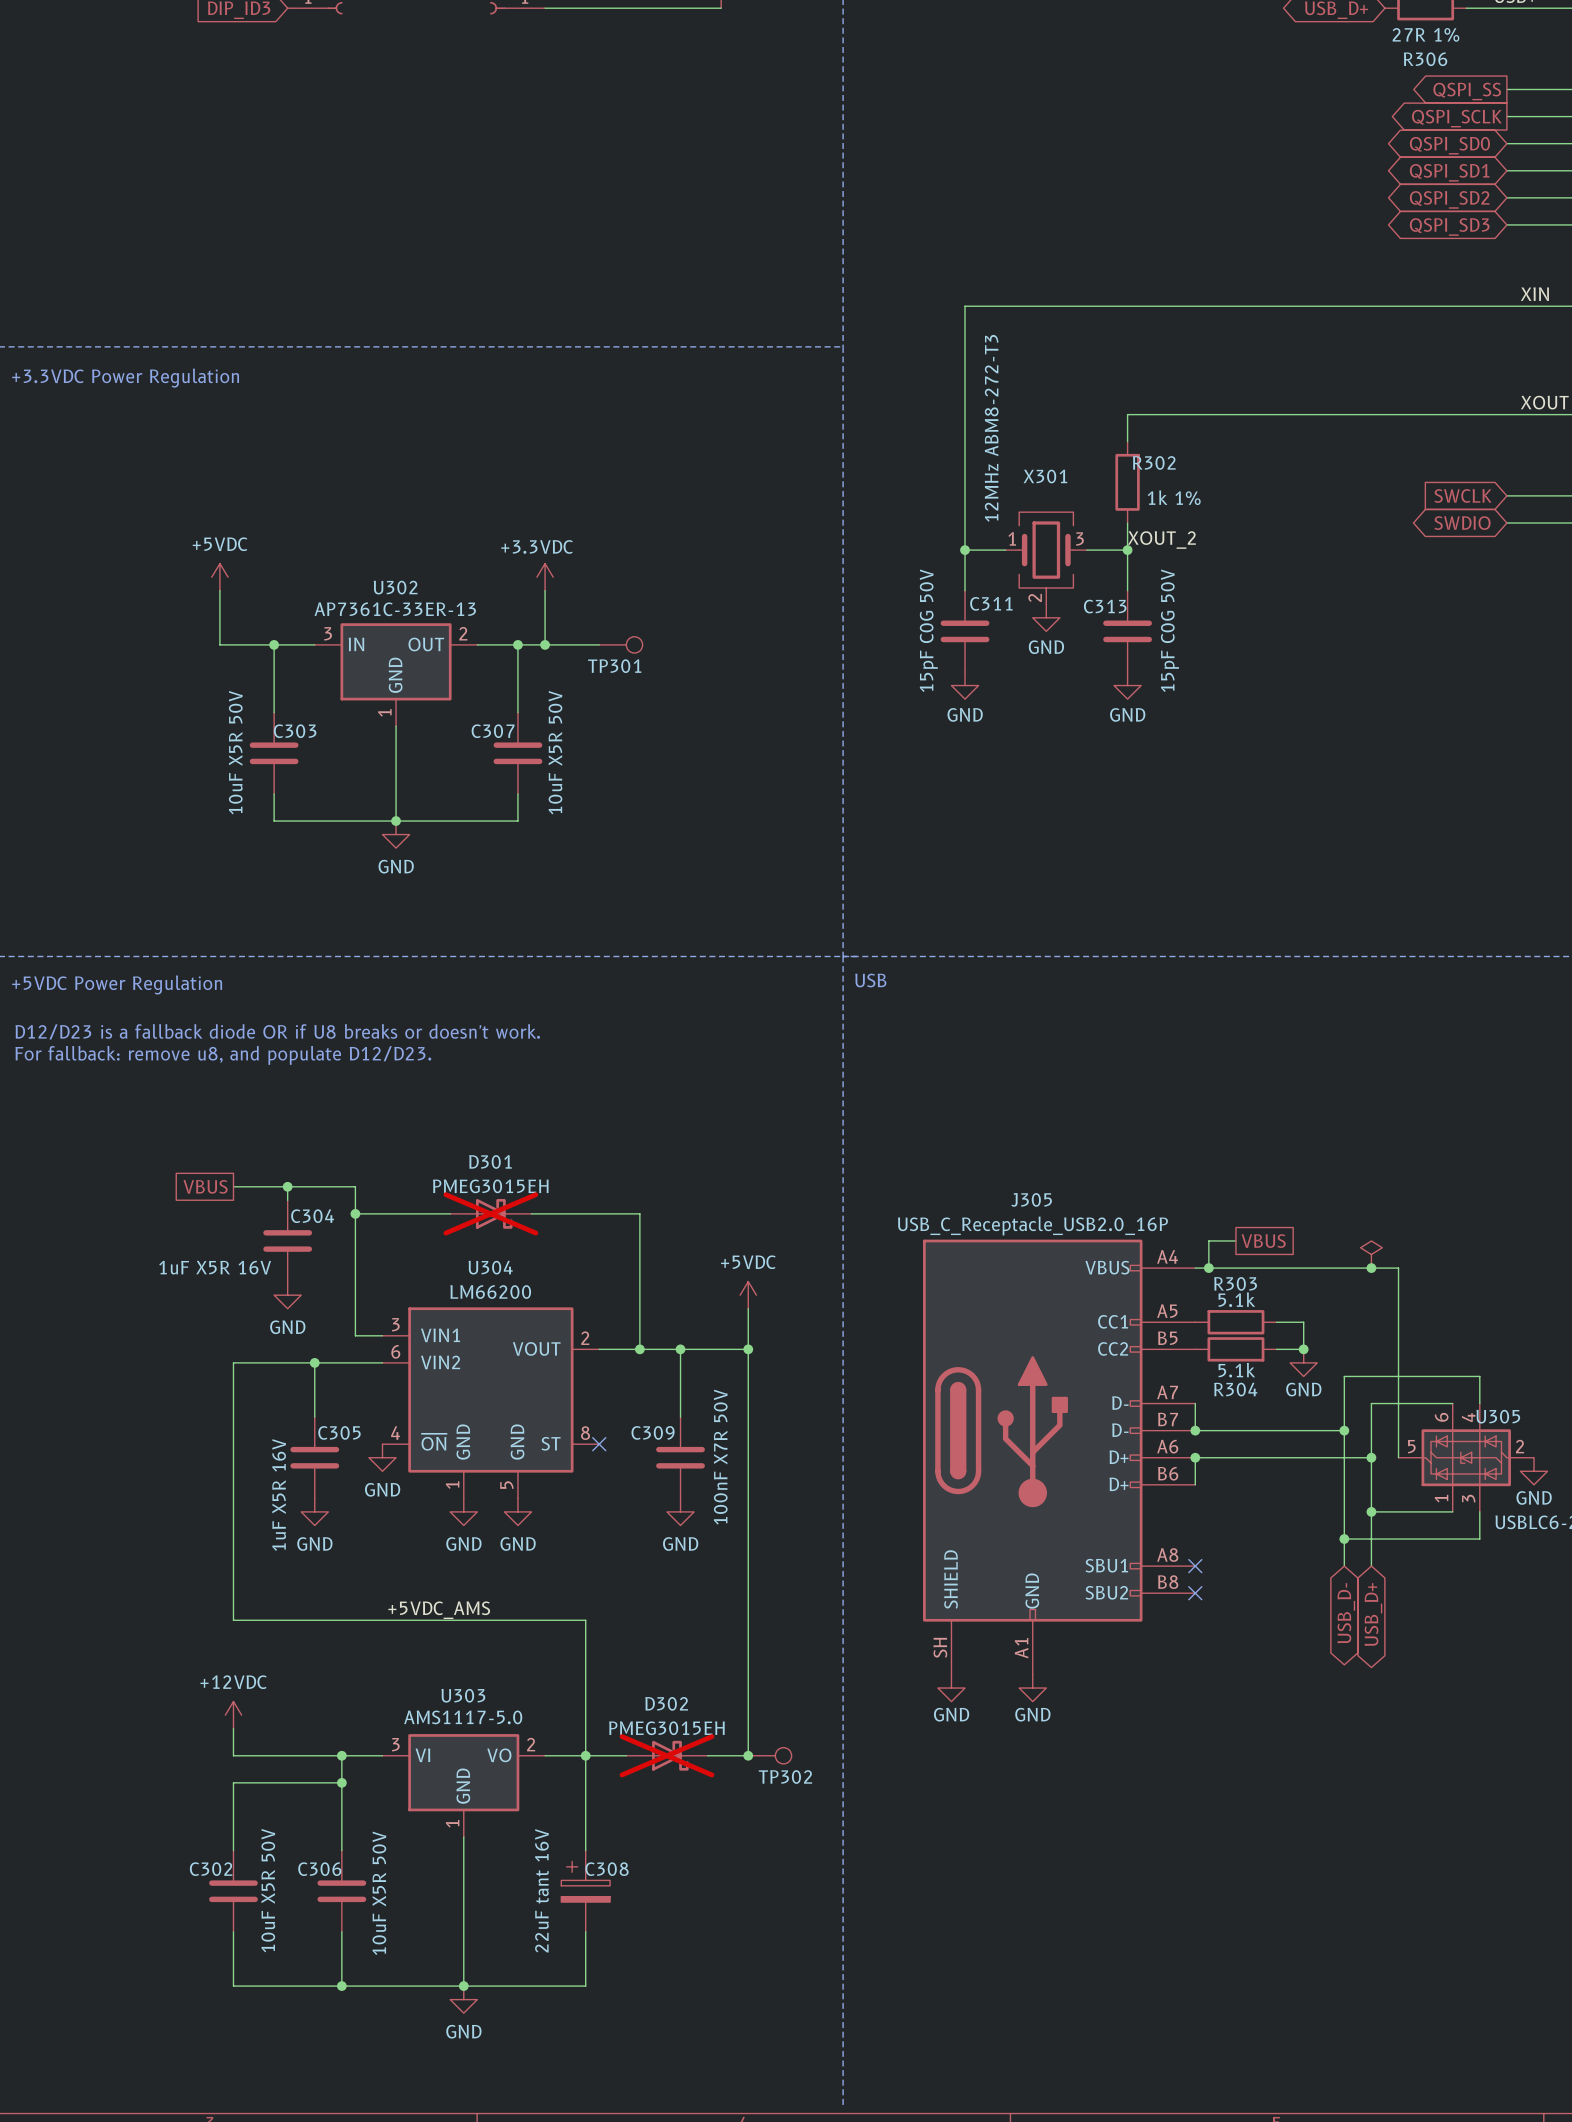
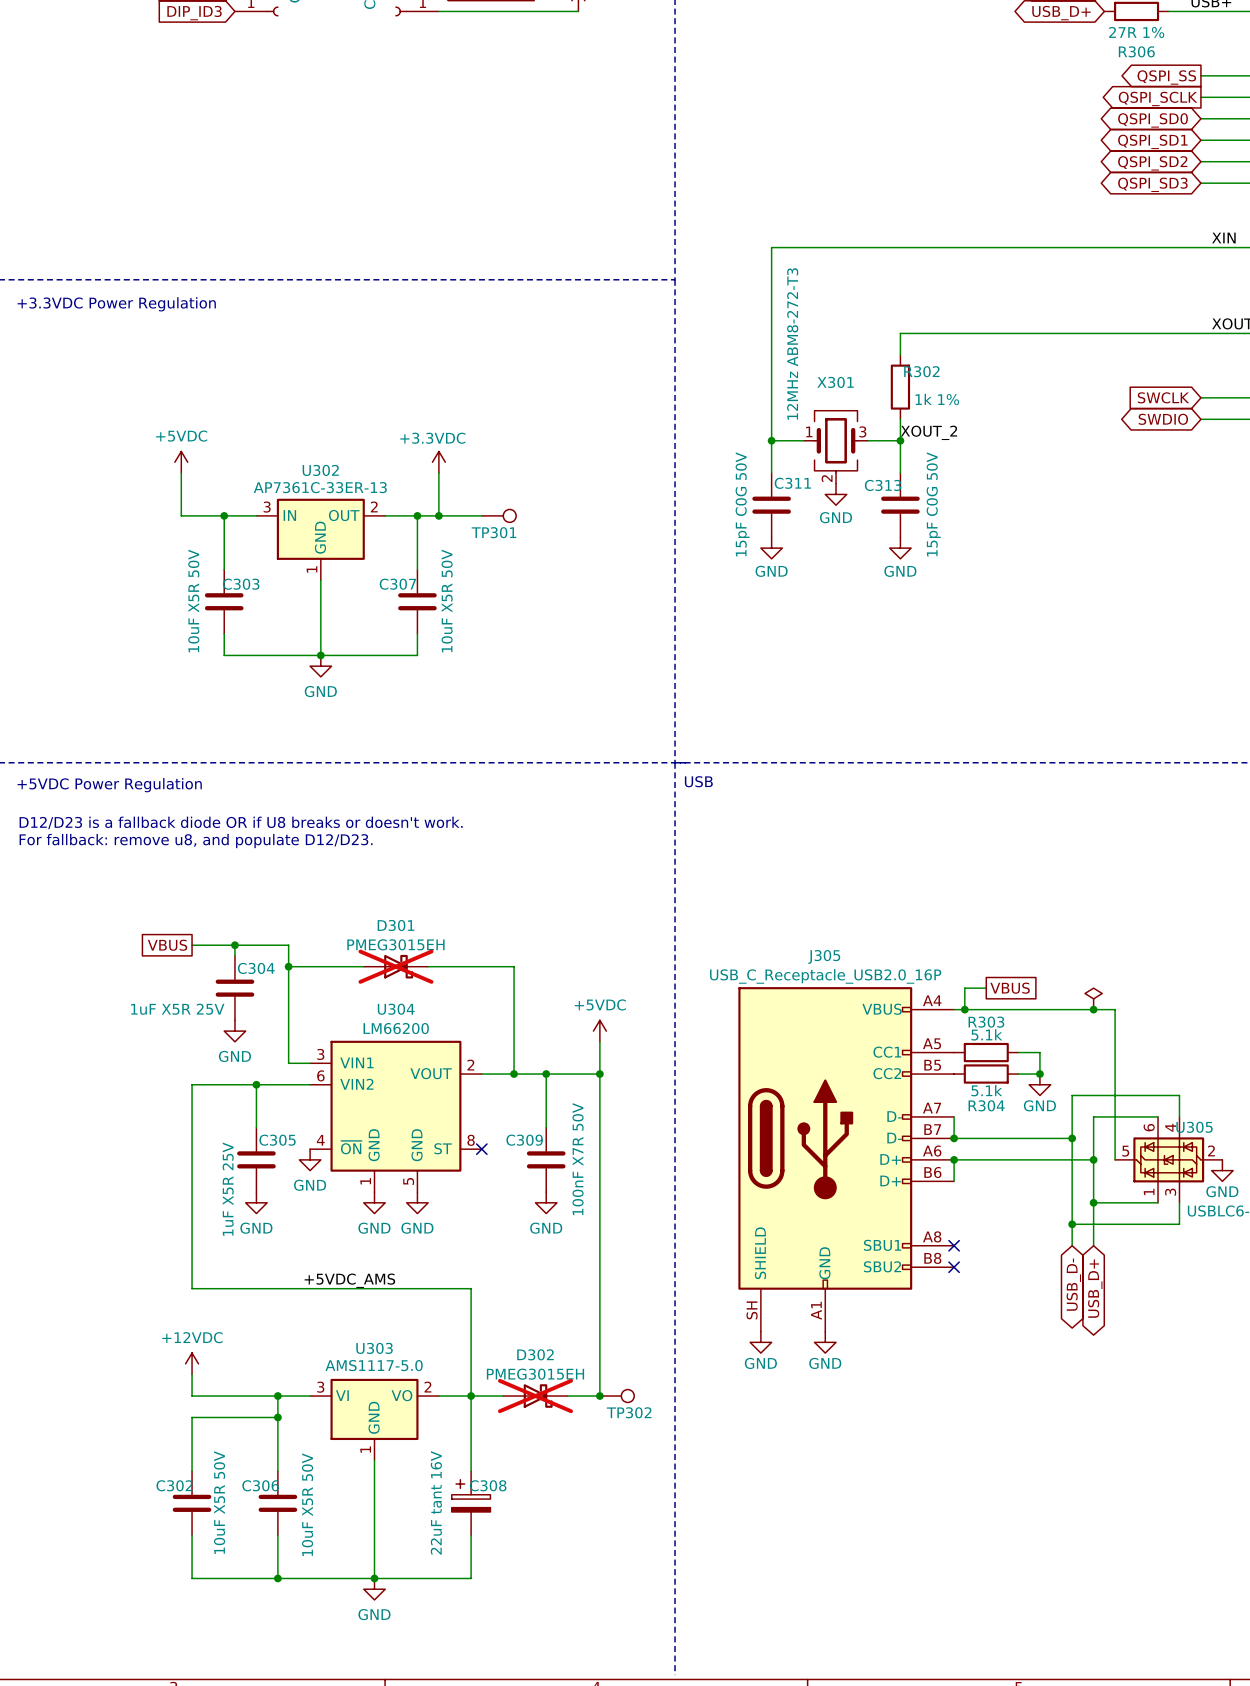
C304 value: 1uF X5R 16V (215, 1267) -> 1uF X5R 25V (177, 1009)
C305 value: 1uF X5R 16V (279, 1495) -> 1uF X5R 25V (228, 1189)

